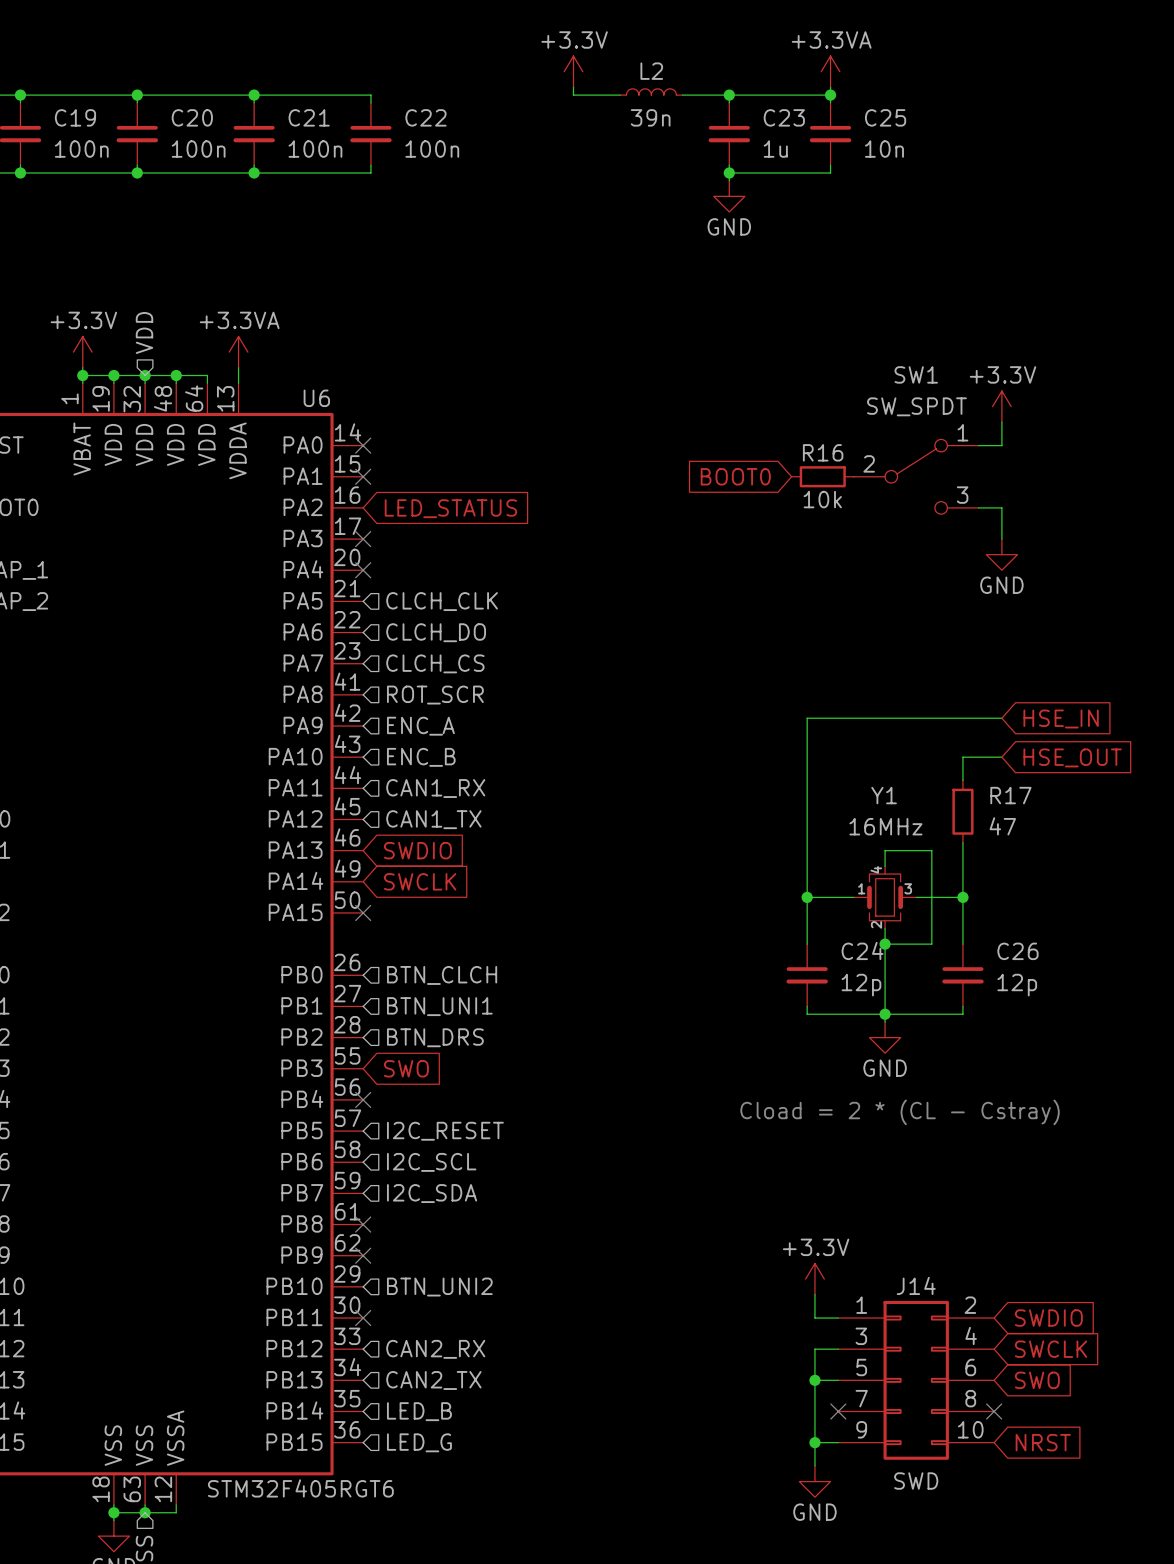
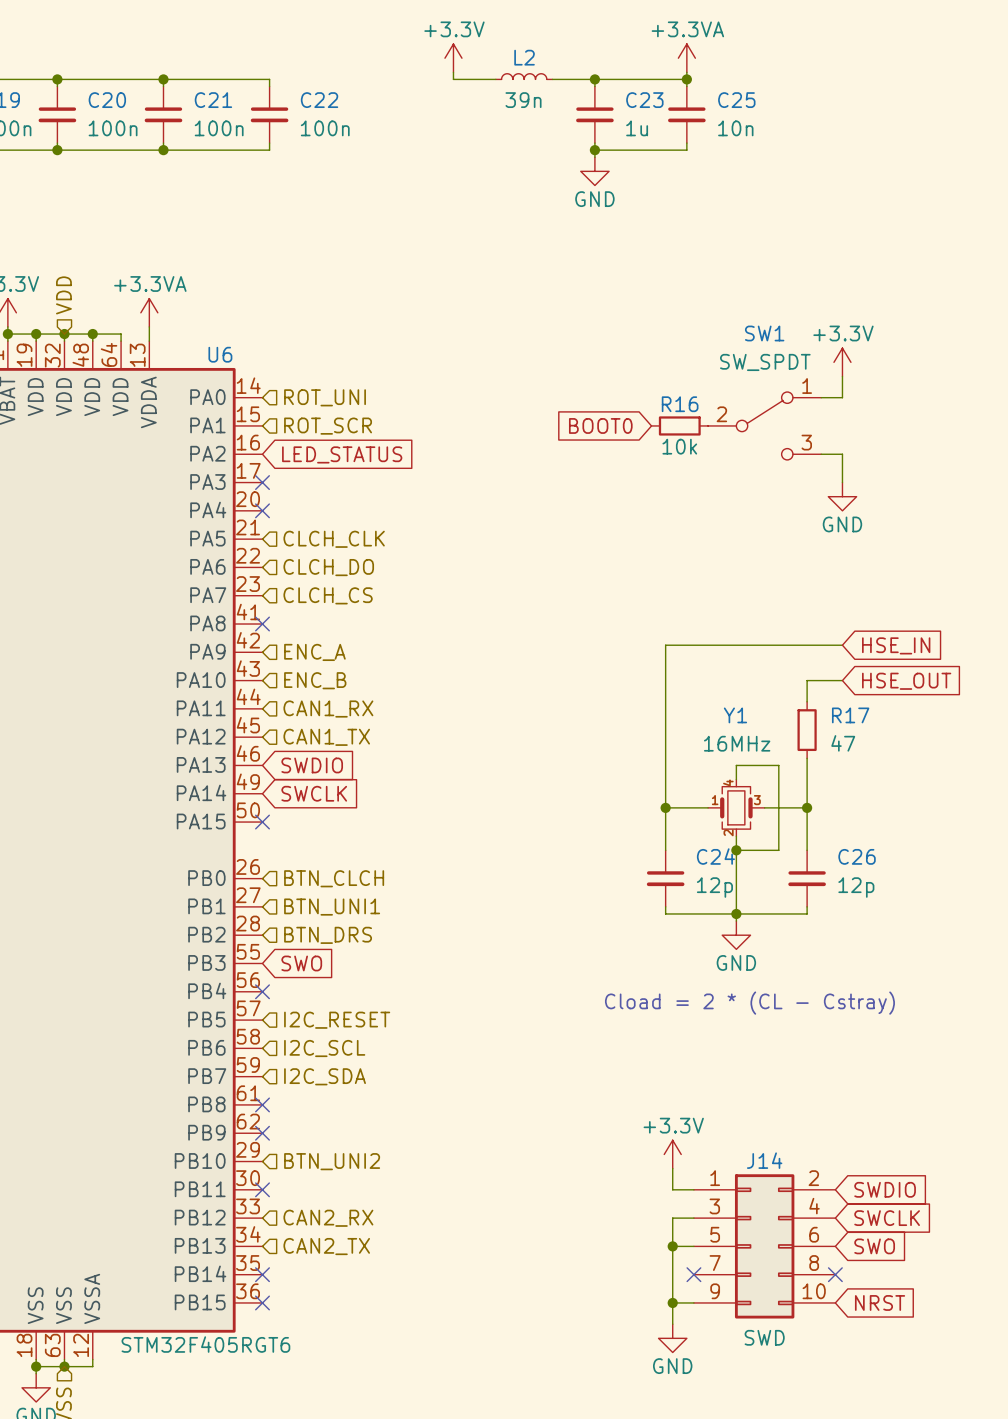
no-connect mark: (363, 445) -> none
hierarchical label: none -> ROT_UNI (325, 397)
no-connect mark: (363, 476) -> none
no-connect mark: none -> (262, 624)
hierarchical label position: ROT_SCR (435, 695) -> ROT_SCR (328, 426)
no-connect mark: none -> (262, 1274)
hierarchical label: LED_B (419, 1411) -> none
no-connect mark: none -> (262, 1302)
hierarchical label: LED_G (419, 1442) -> none

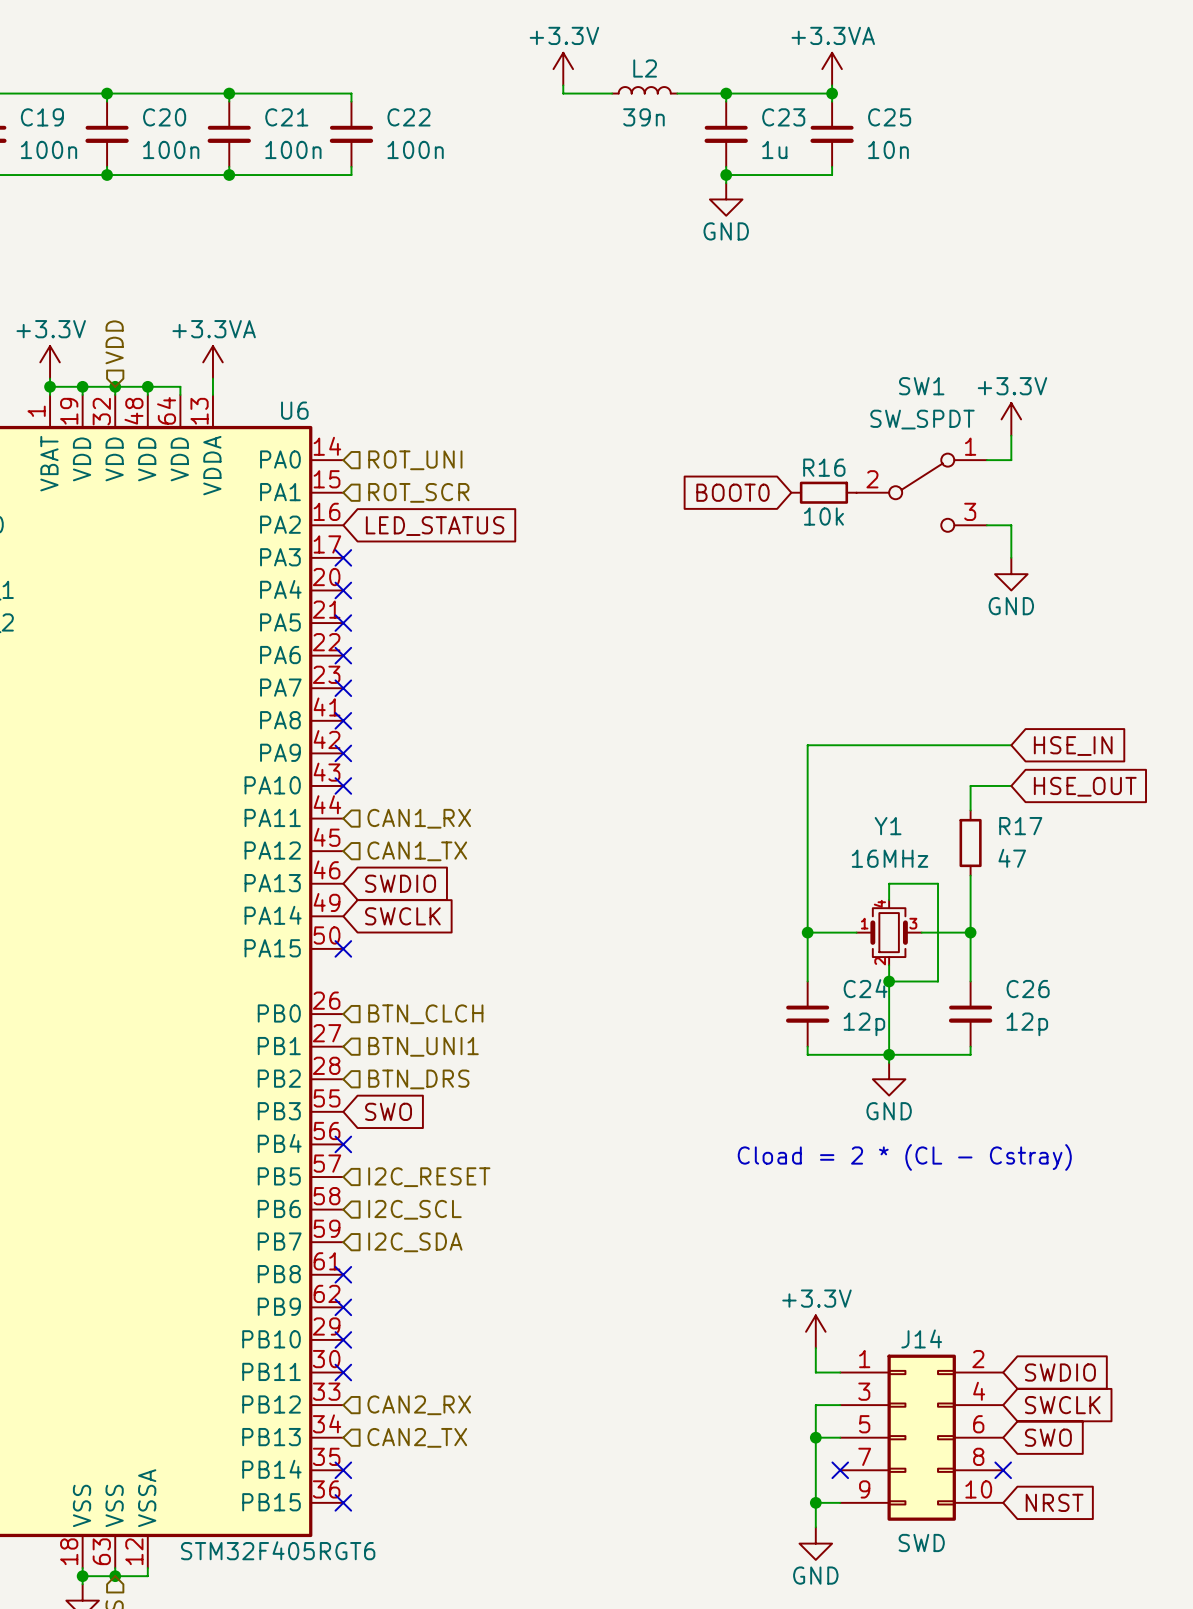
no-connect mark: none -> (343, 623)
hierarchical label: CLCH_CLK (334, 539) -> none
no-connect mark: none -> (343, 655)
hierarchical label: CLCH_DO (328, 567) -> none
no-connect mark: none -> (343, 688)
hierarchical label: CLCH_CS (328, 595) -> none
no-connect mark: none -> (343, 753)
hierarchical label: ENC_A (314, 652) -> none
no-connect mark: none -> (343, 785)
hierarchical label: ENC_B (315, 680) -> none
no-connect mark: none -> (343, 1339)
hierarchical label: BTN_UNI2 (332, 1161) -> none

